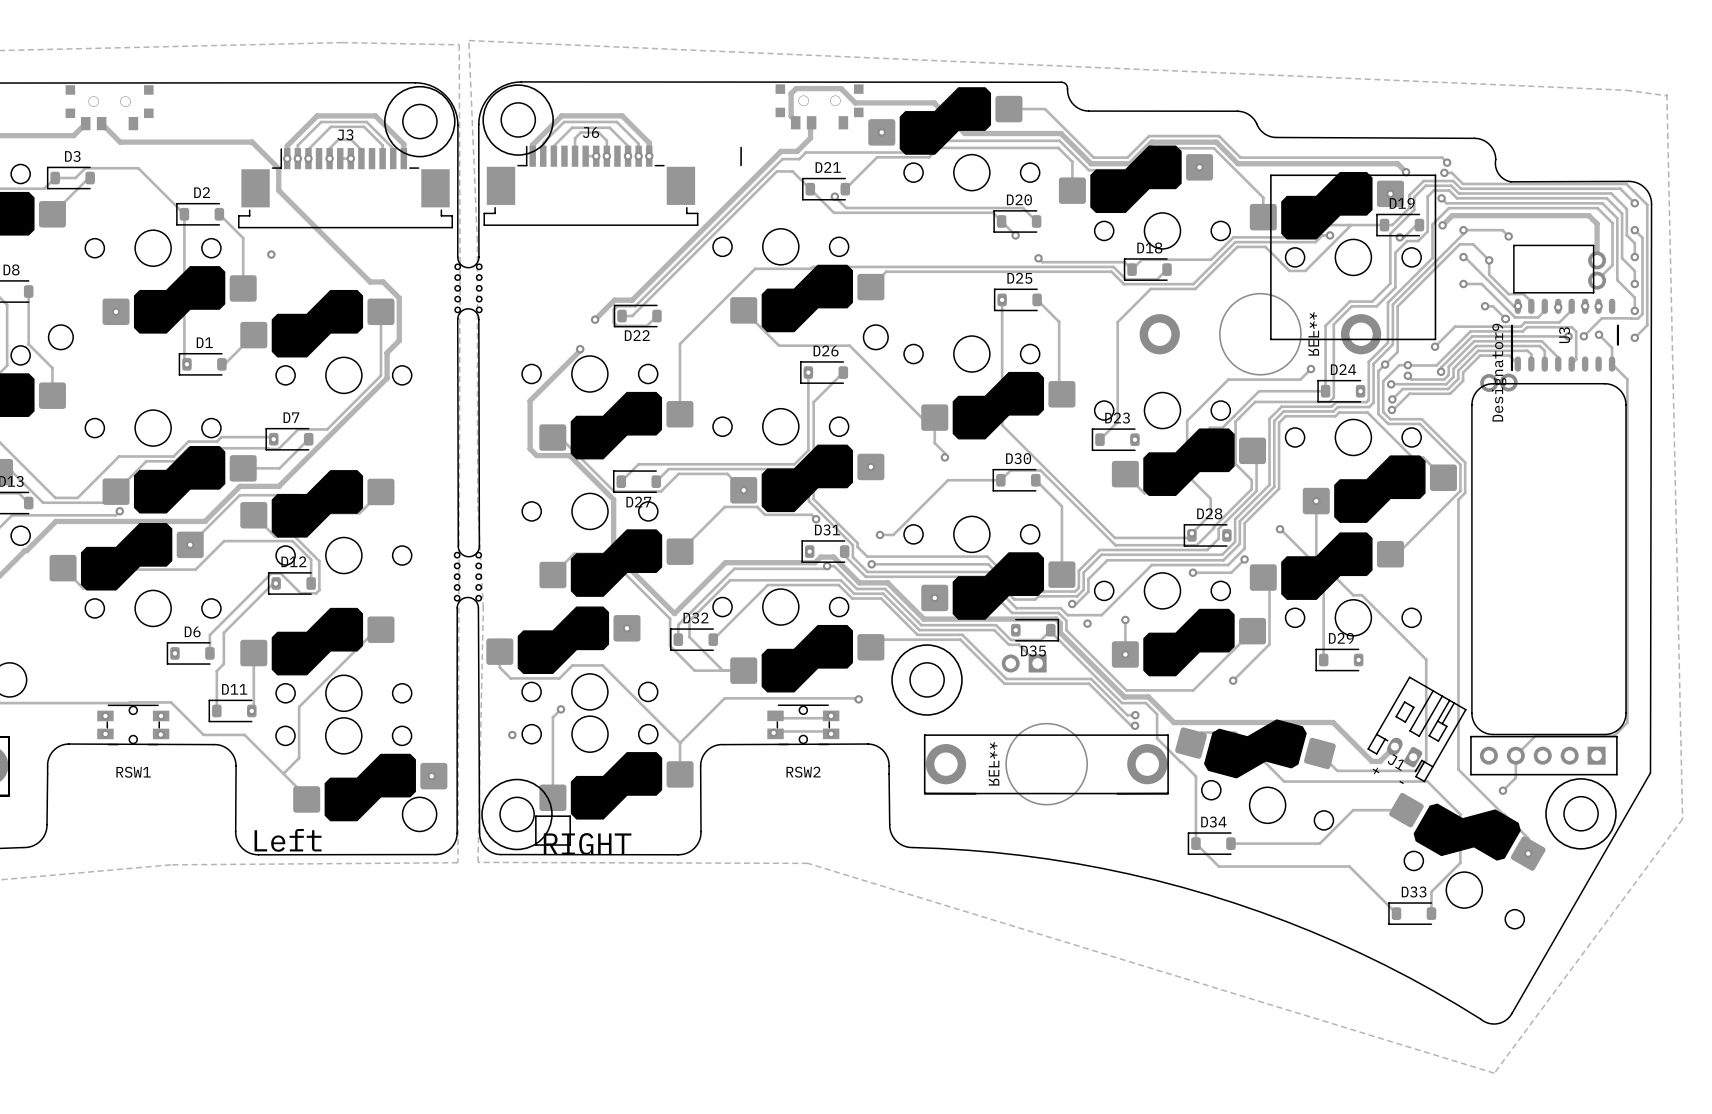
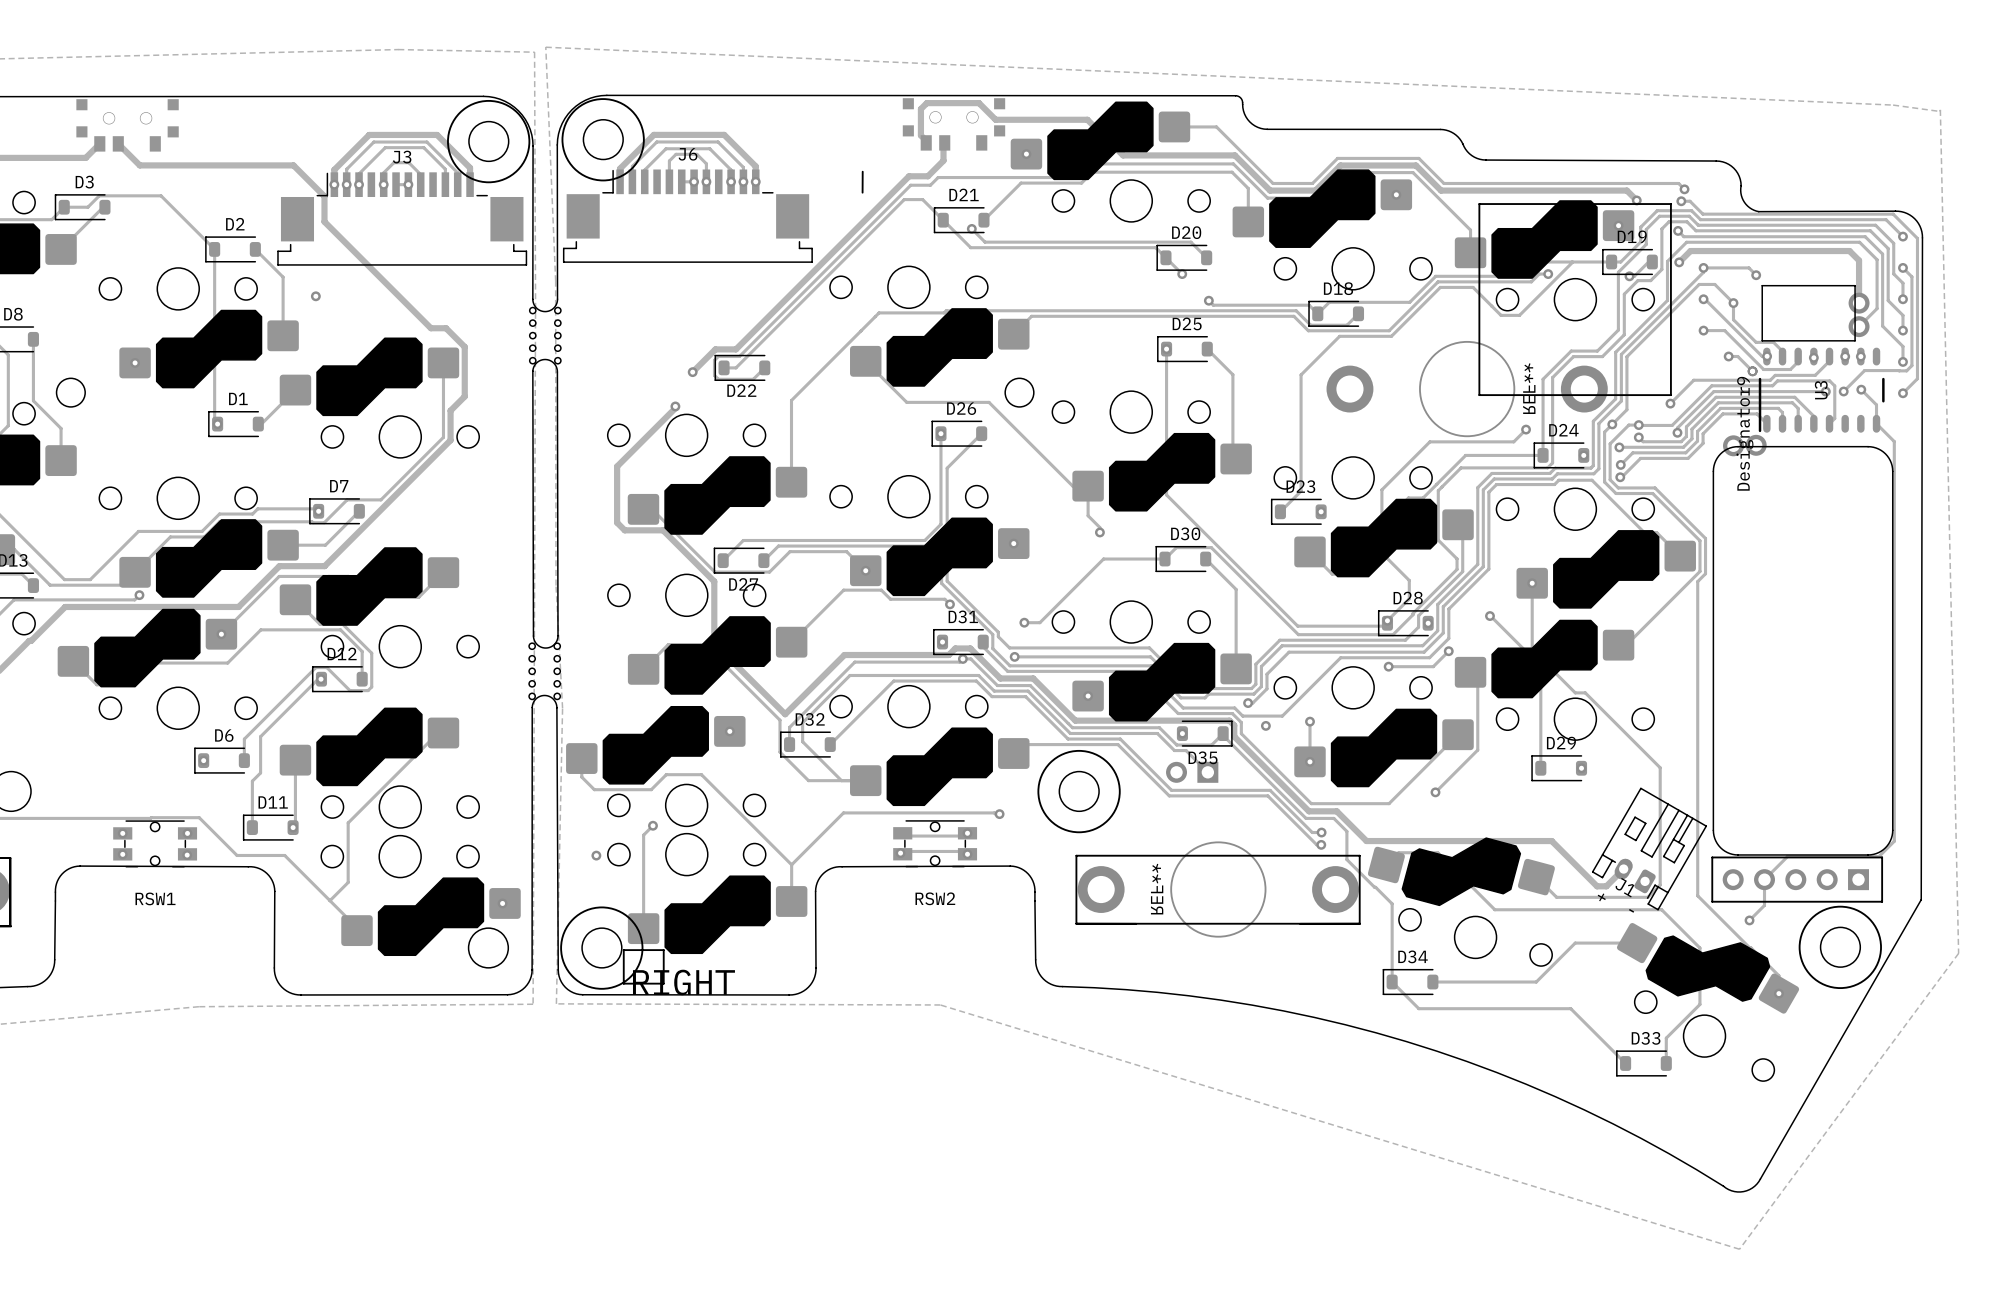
text: Left (288, 840) -> none

